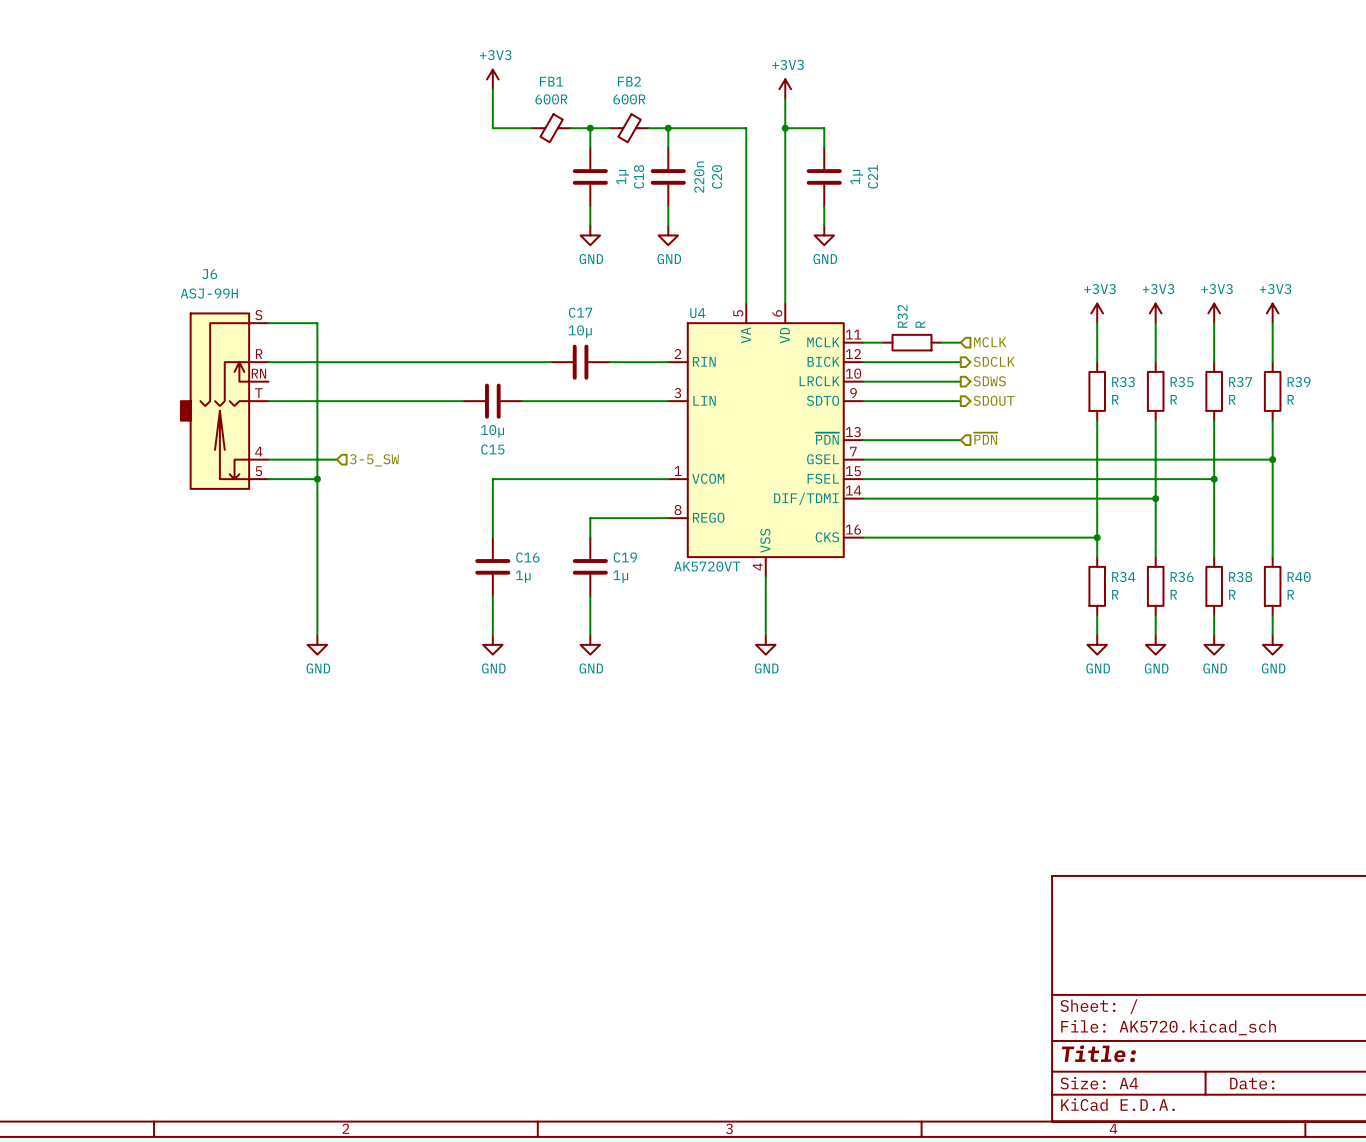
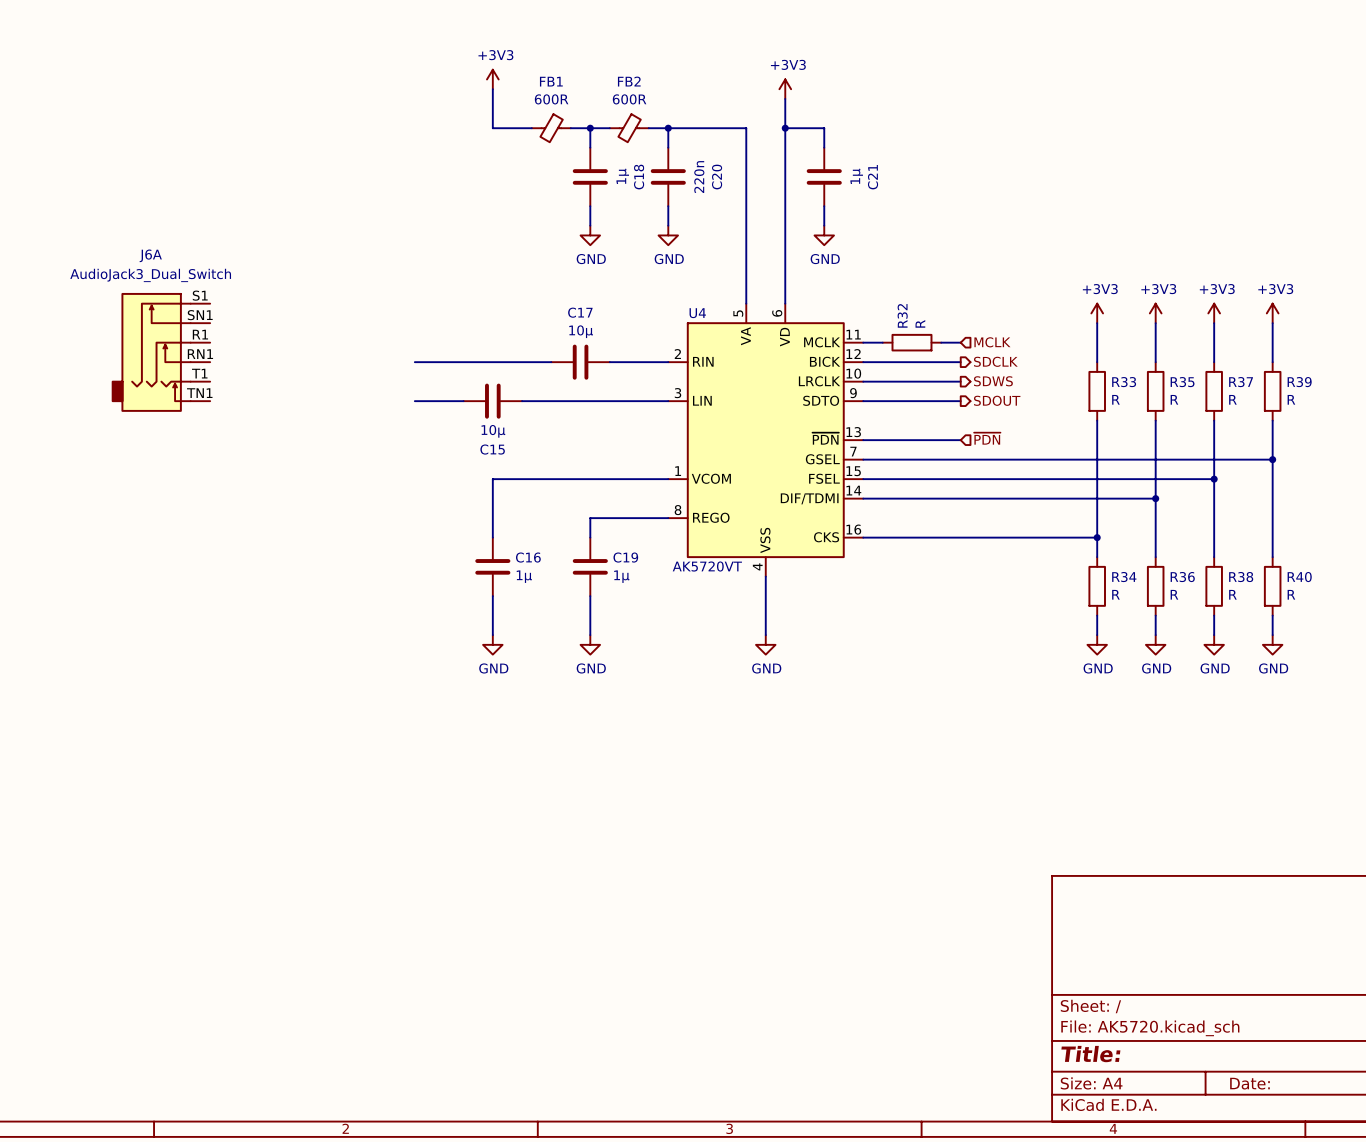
wire: (268, 323) (317, 323) (317, 635) -> none
J6A: none -> AudioJack3_Dual_Switch (160, 352)
wire: (268, 362) (414, 362) -> none
J6: ASJ-99H (224, 401) -> none
wire: (268, 401) (414, 401) -> none
wire: (268, 459) (336, 459) -> none
hierarchical label: 3-5_SW (374, 460) -> none
wire: (268, 479) (317, 479) -> none
junction: (317, 479) -> none
power symbol: GND (317, 644) -> none

